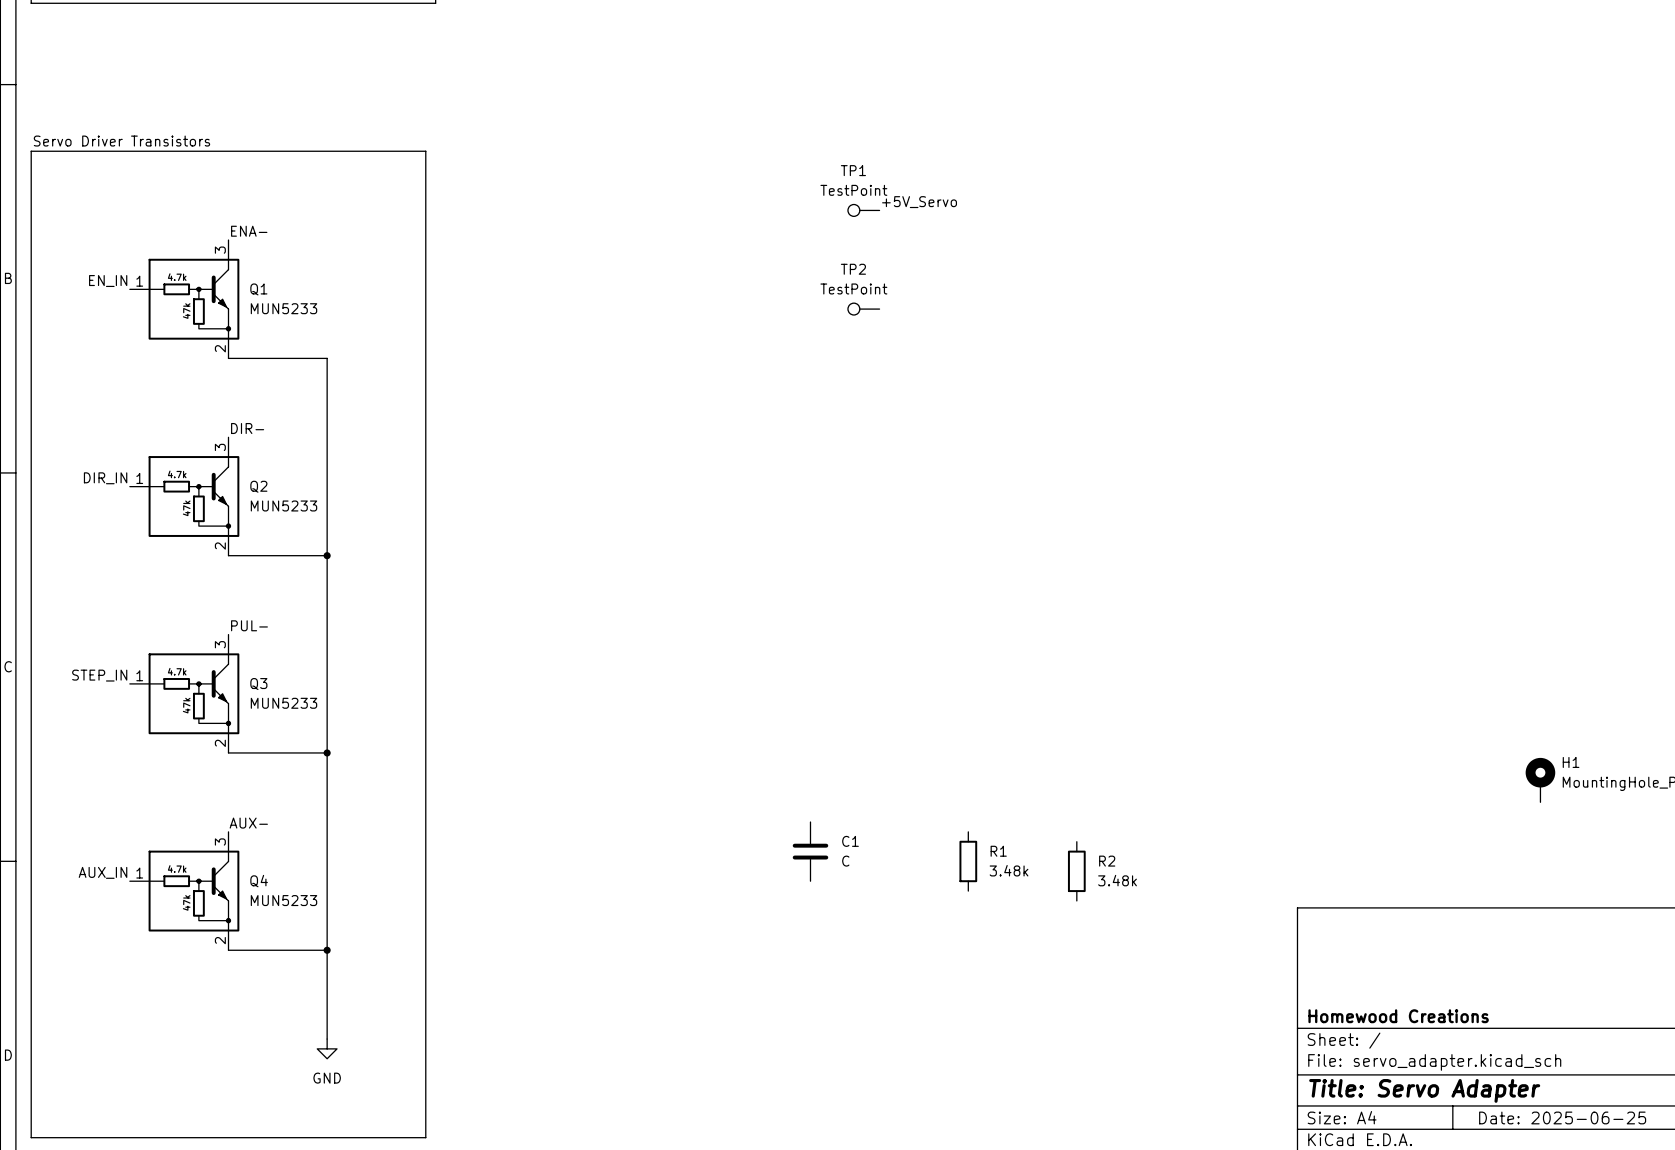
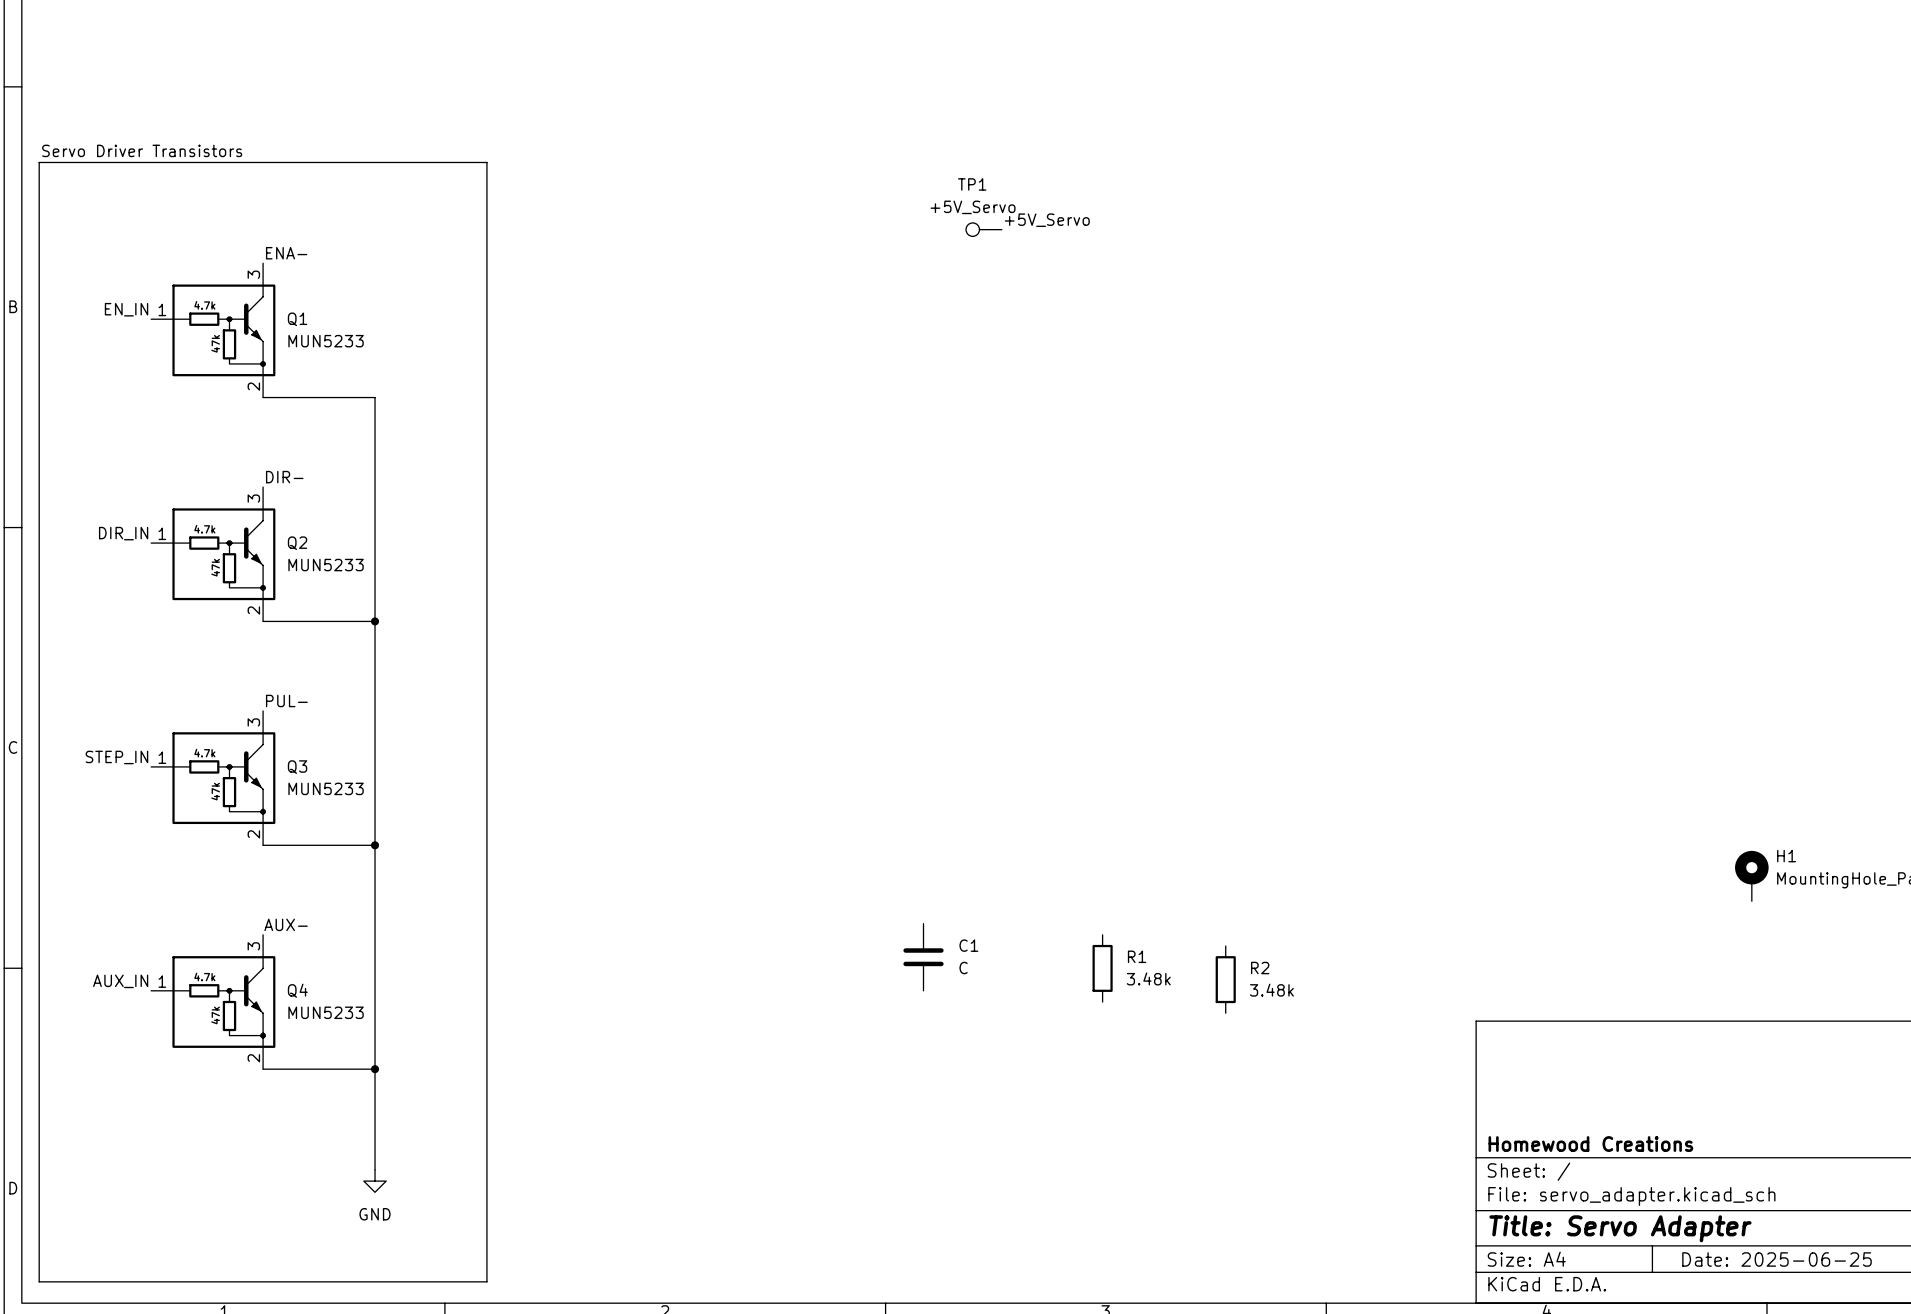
TP1 value: TestPoint (853, 190) -> +5V_Servo (973, 207)
TP2: TestPoint (863, 309) -> none

